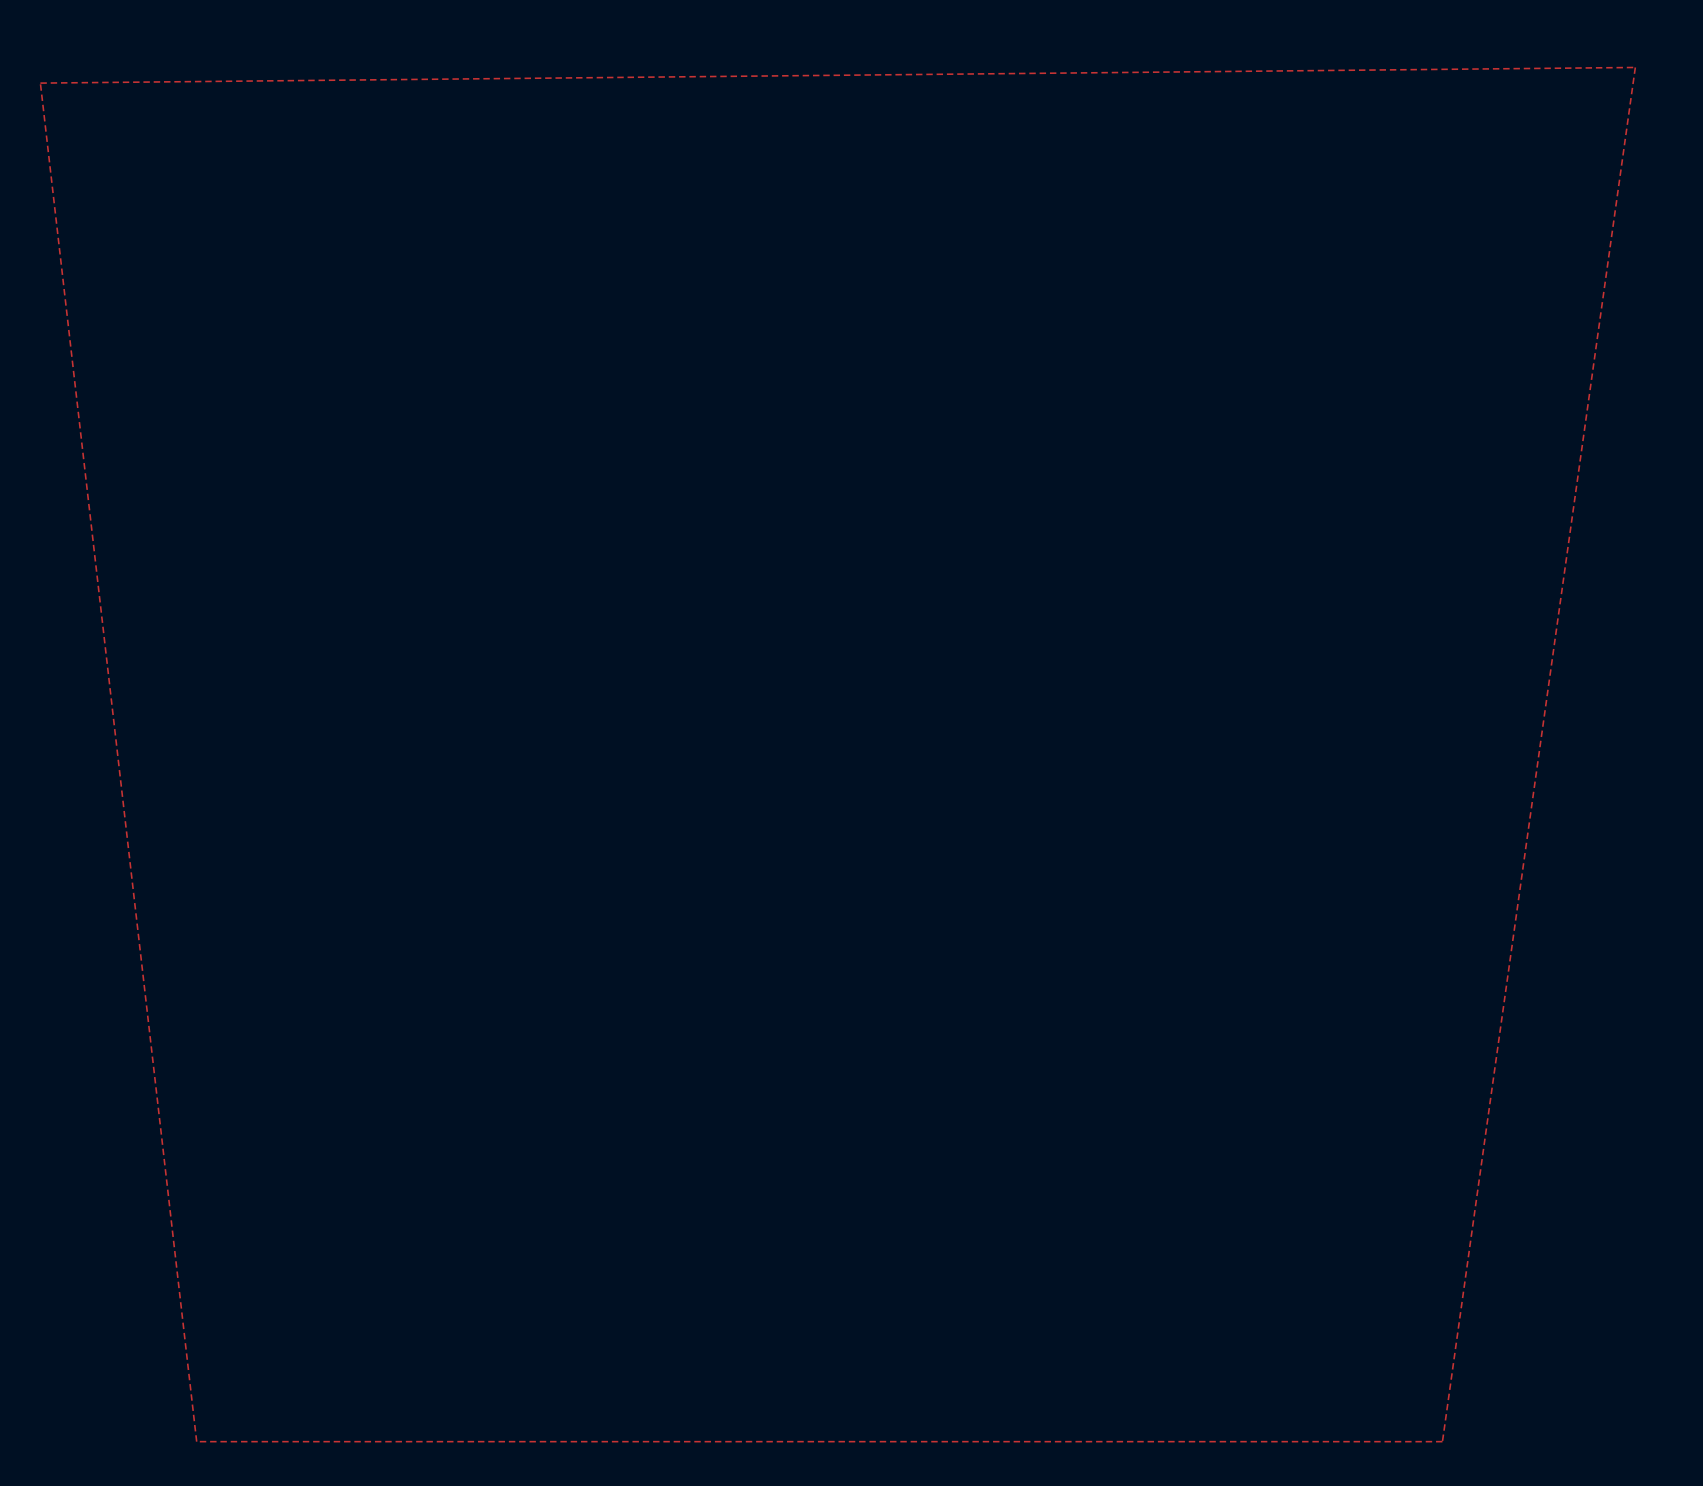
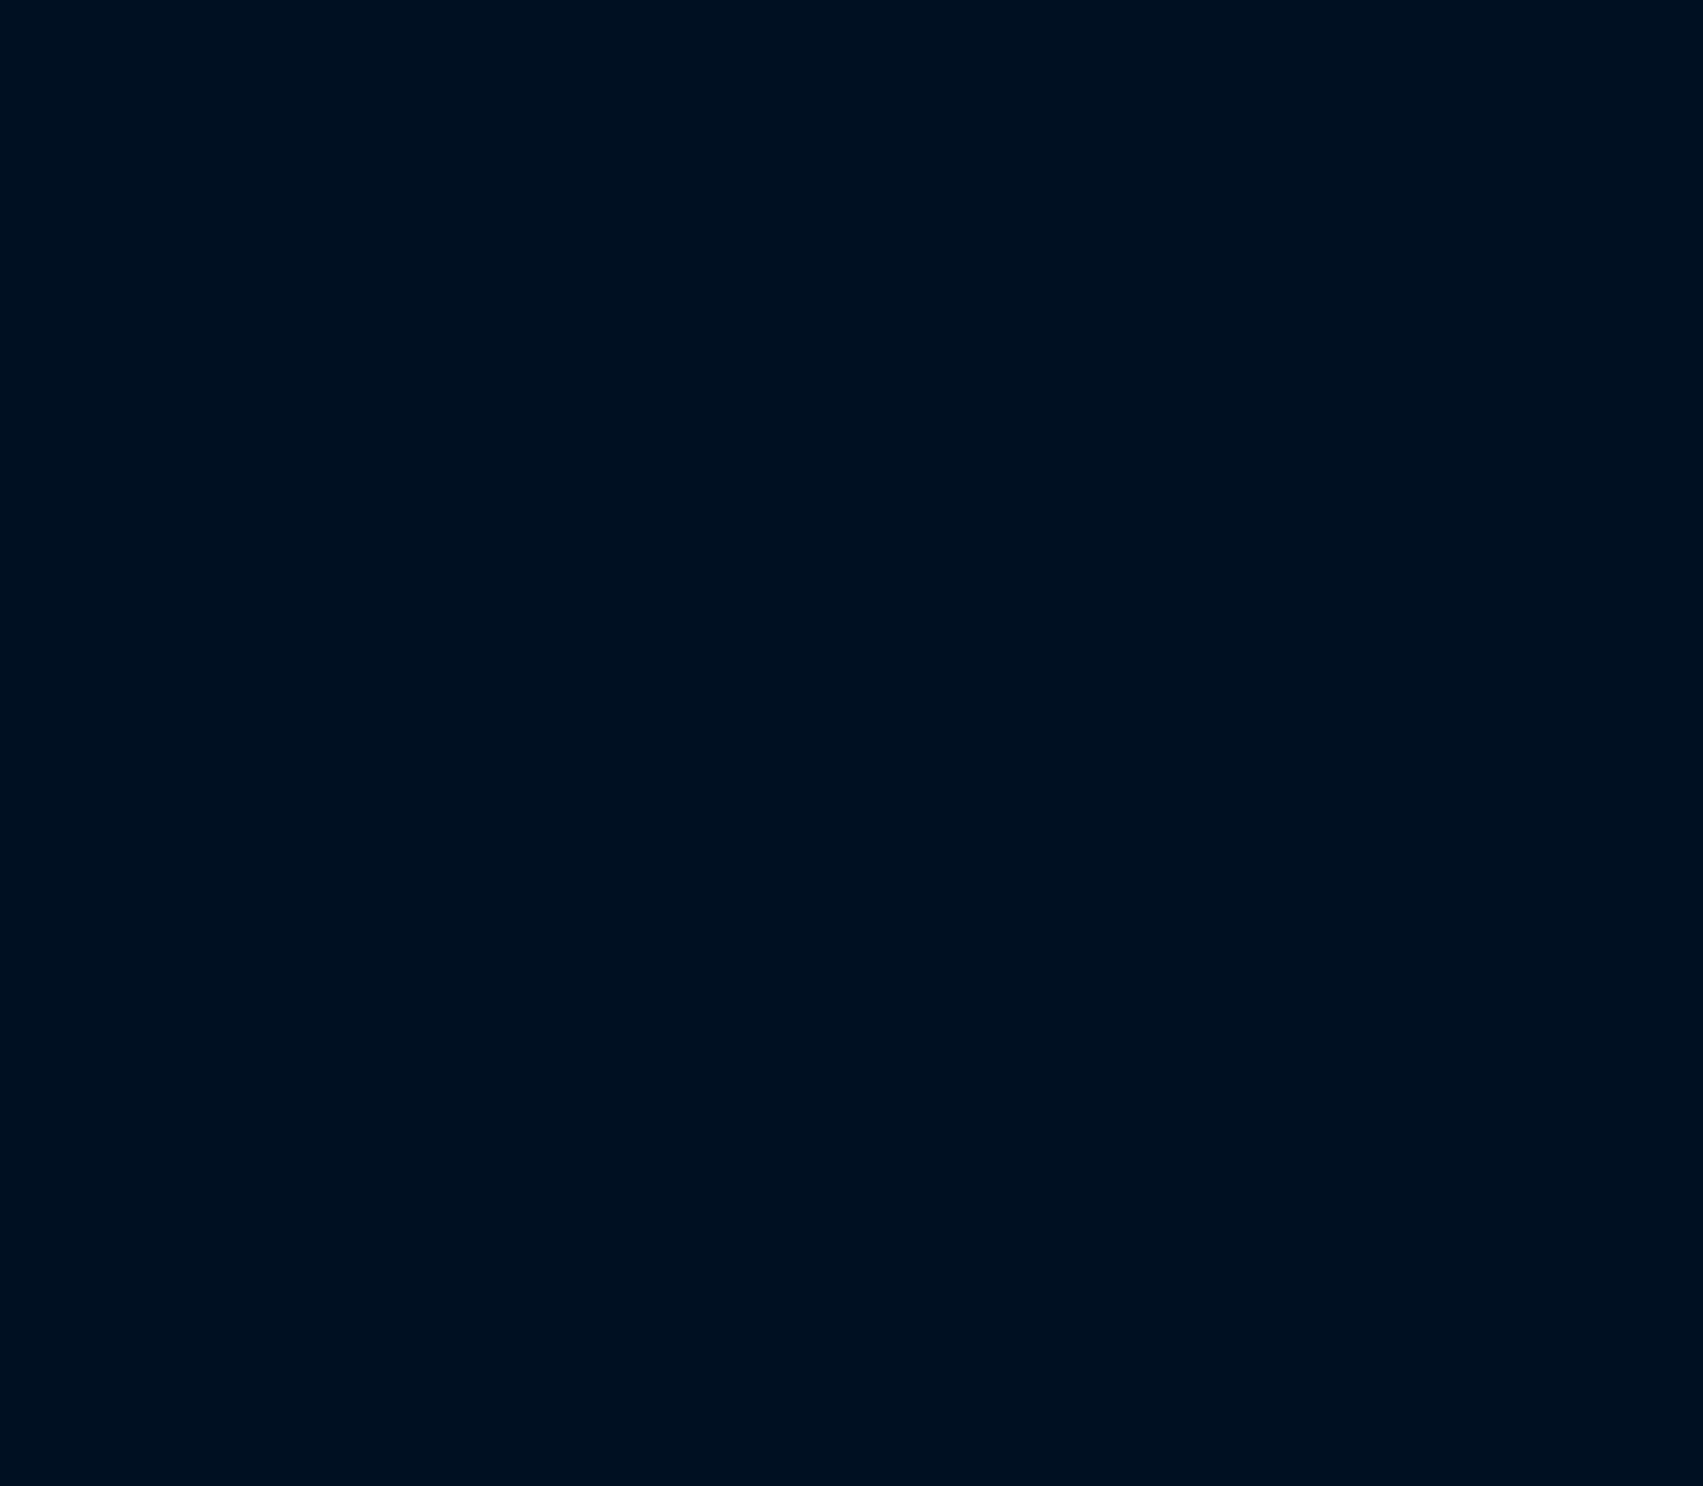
top zone outline: (1635, 67) (40, 83) (196, 1441) (1442, 1441) (1635, 67) -> none

